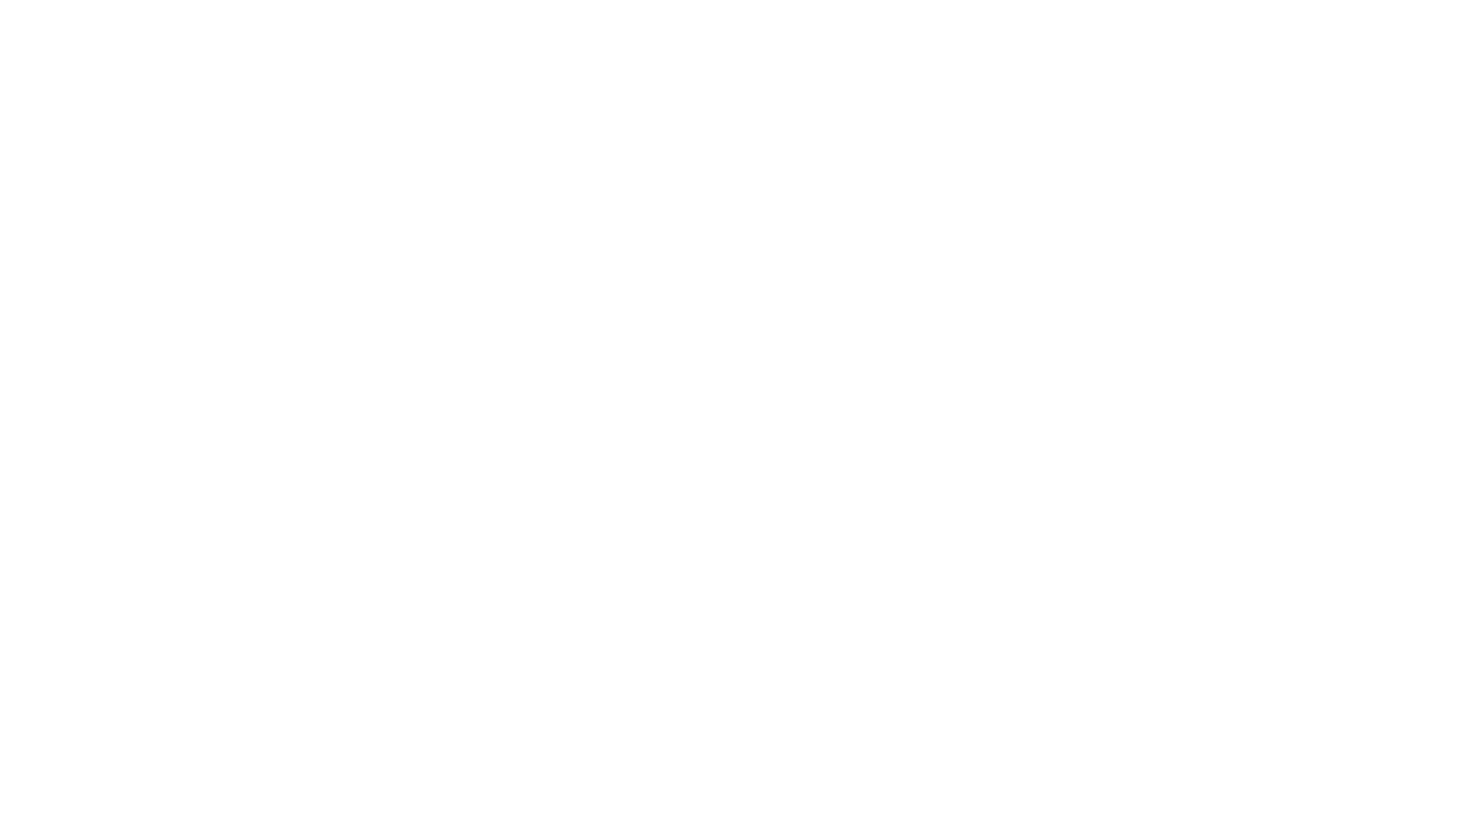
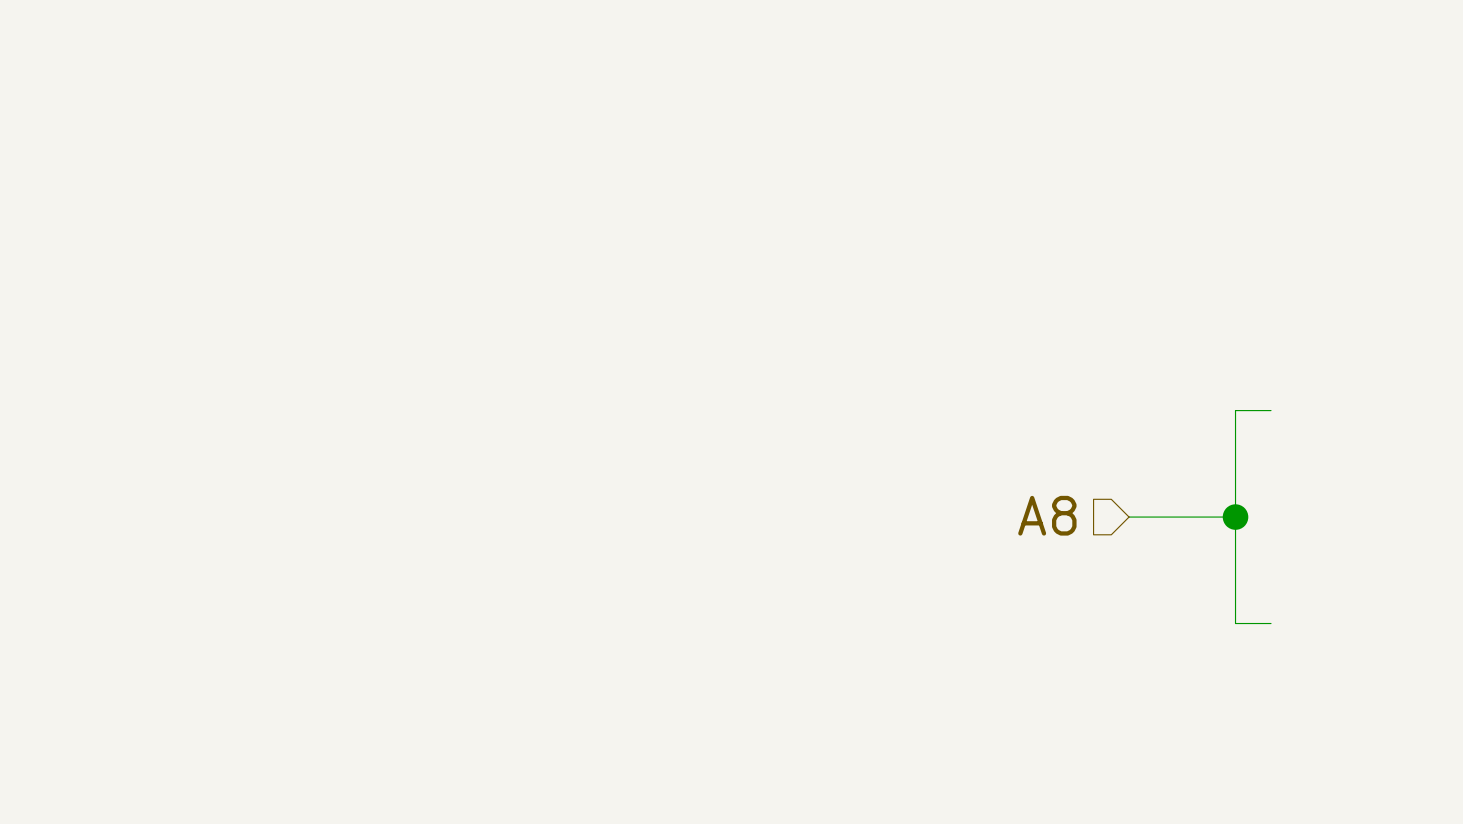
wire: none -> (1271, 410) (1235, 410) (1235, 623) (1271, 623)
hierarchical label: none -> A8 (1047, 515)
wire: none -> (1129, 517) (1235, 517)
junction: none -> (1235, 517)

